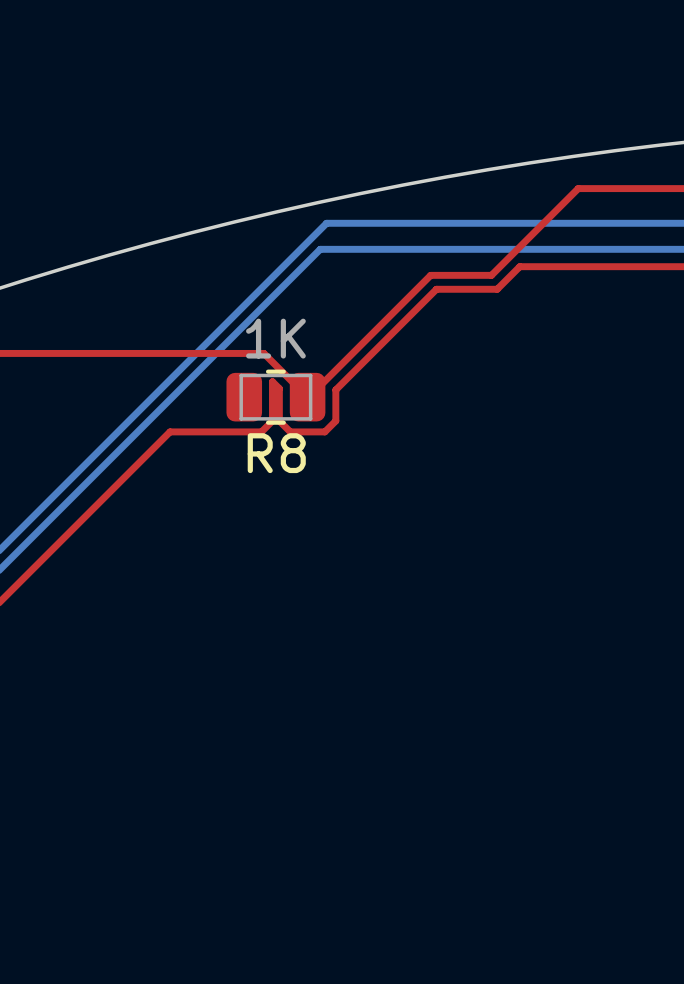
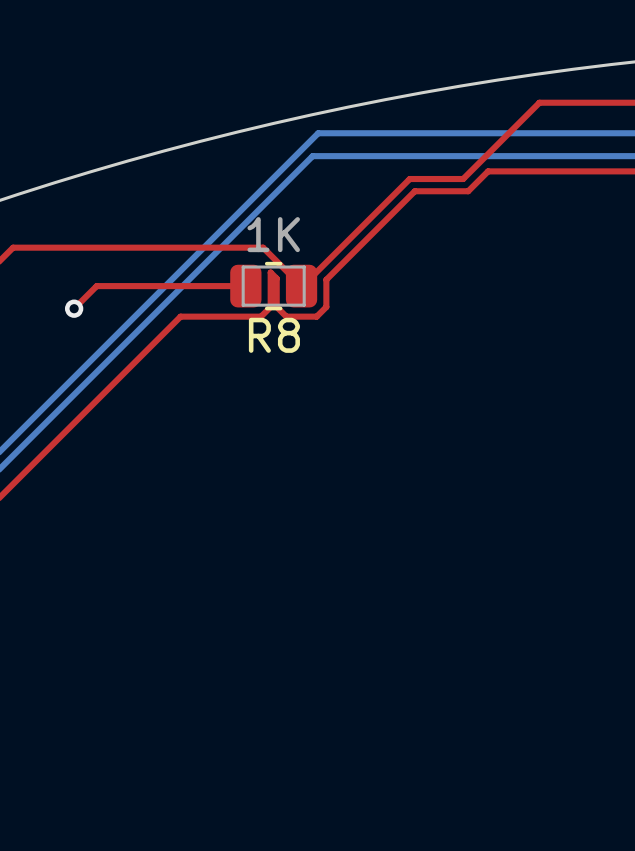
top track: none -> (245, 286) (96, 286) (74, 308)
via: none -> (74, 308)

